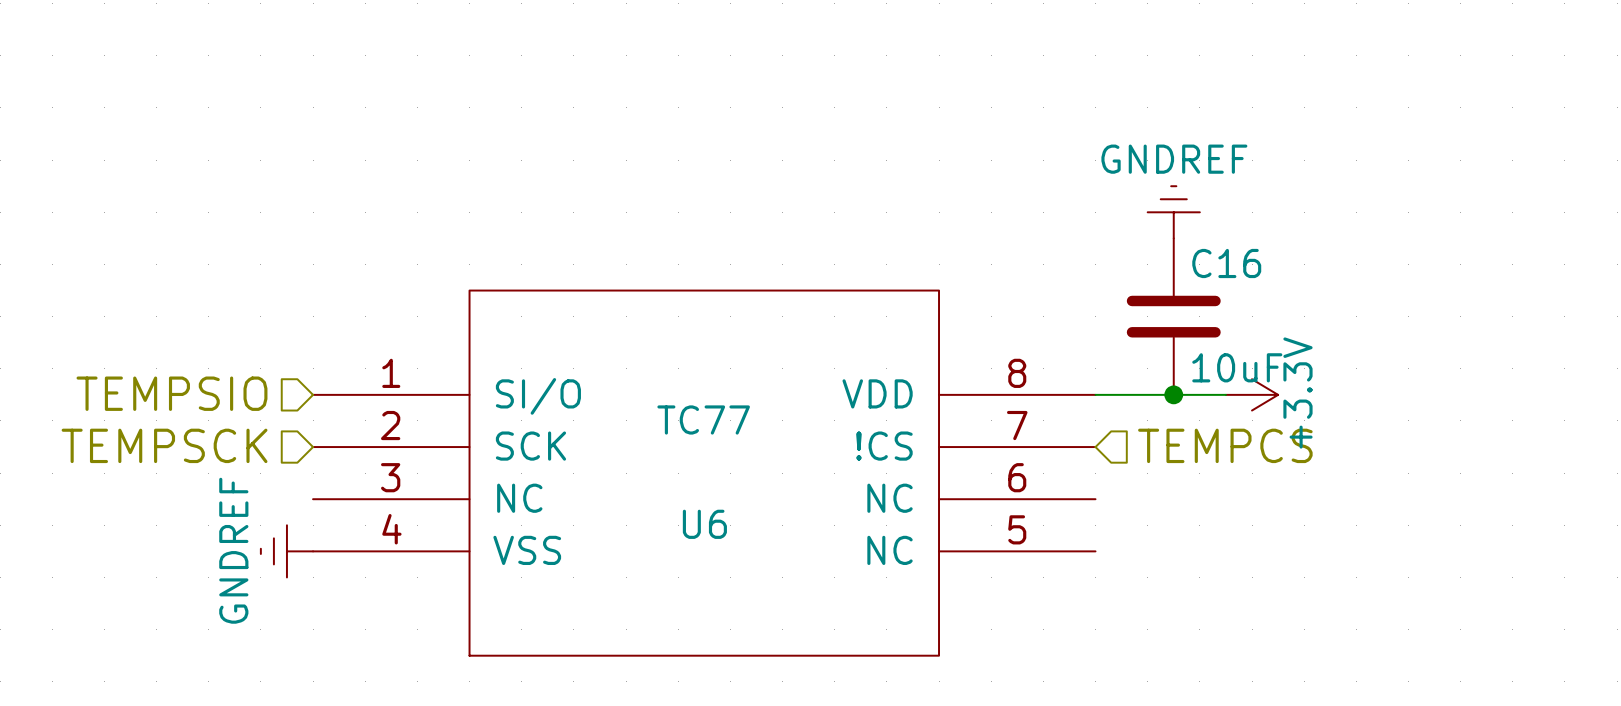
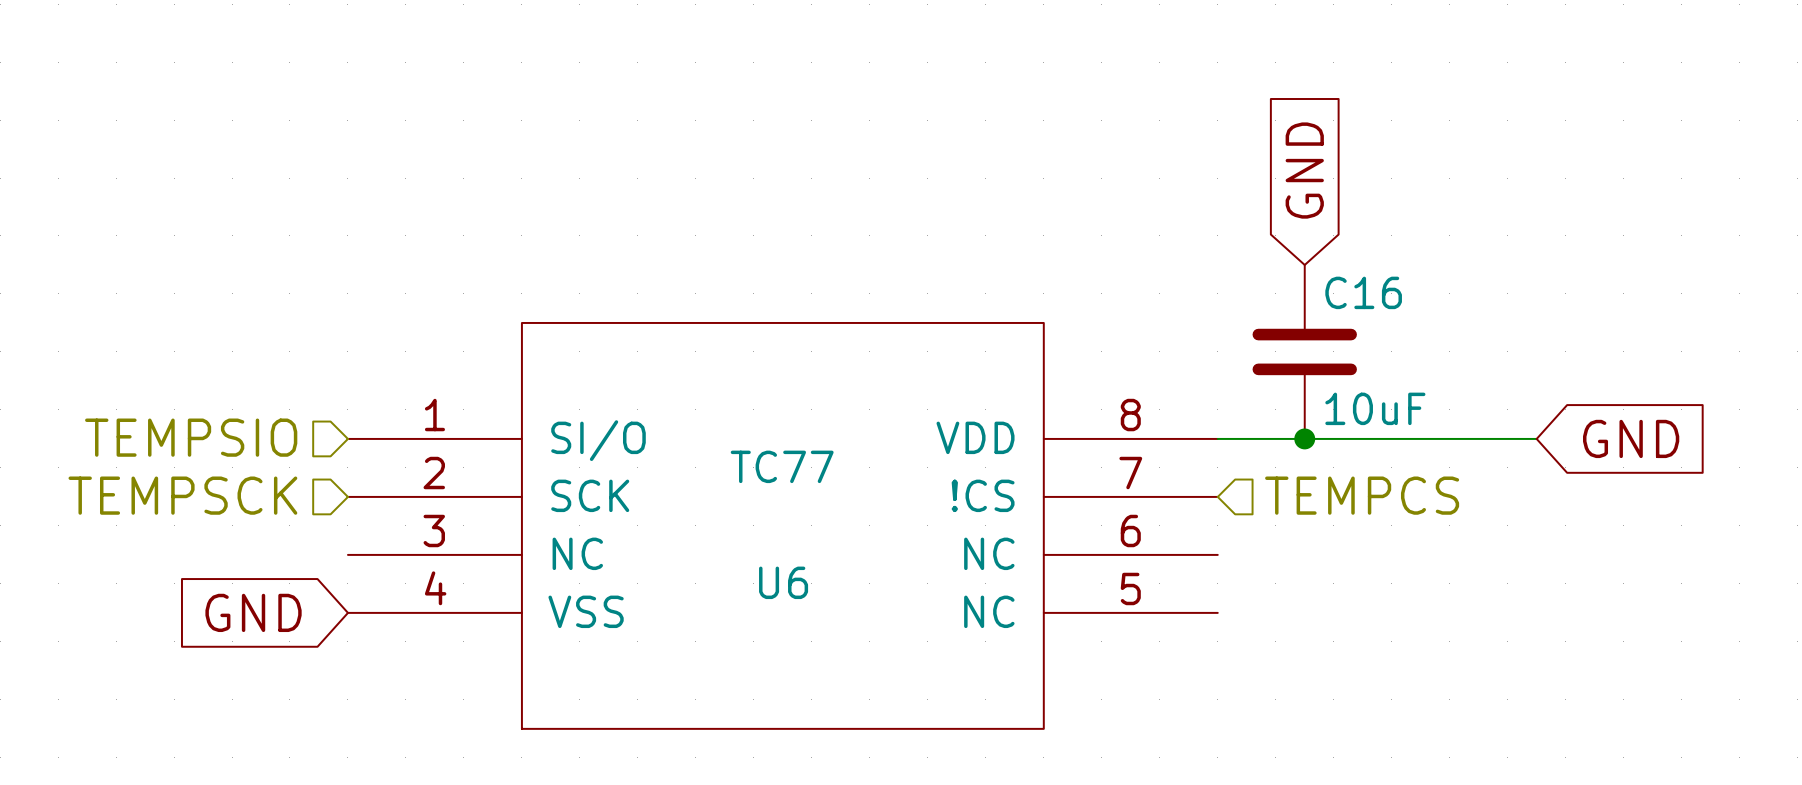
global label: none -> GND (1304, 170)
power symbol: GNDREF (1173, 212) -> none
wire: none -> (1362, 438) (1536, 438)
power symbol: +3.3V (1252, 394) -> none
global label: none -> GND (1631, 438)
global label: none -> GND (253, 612)
power symbol: GNDREF (286, 551) -> none

